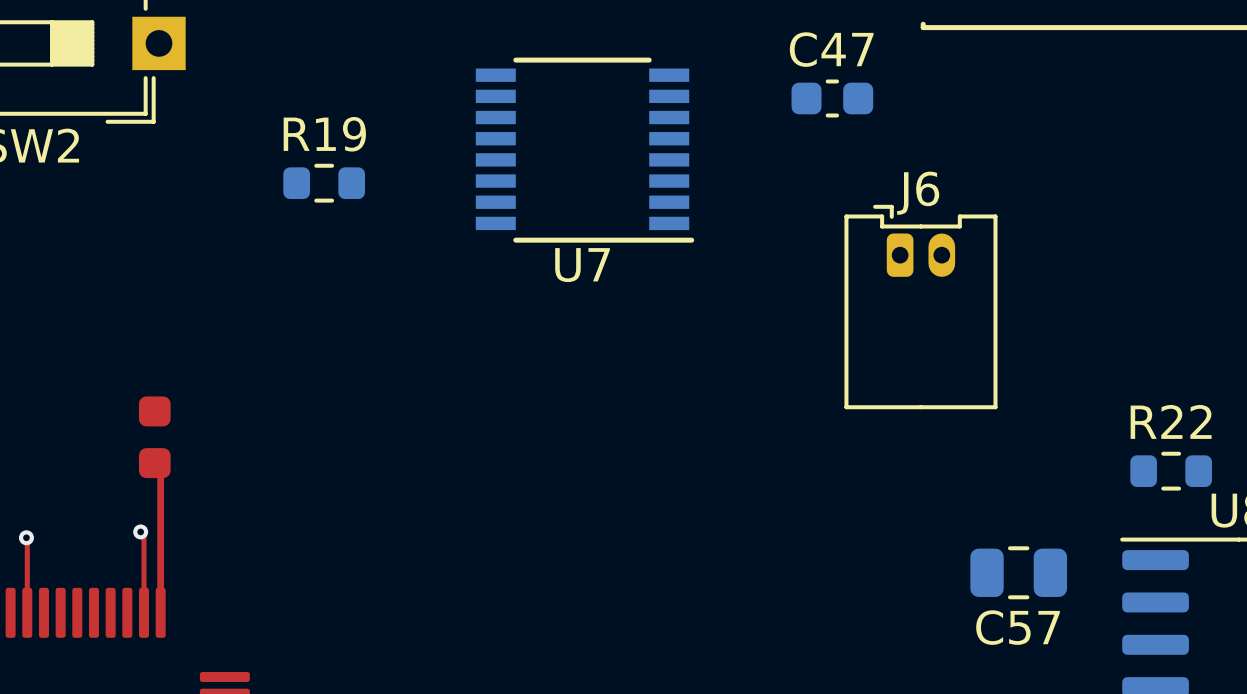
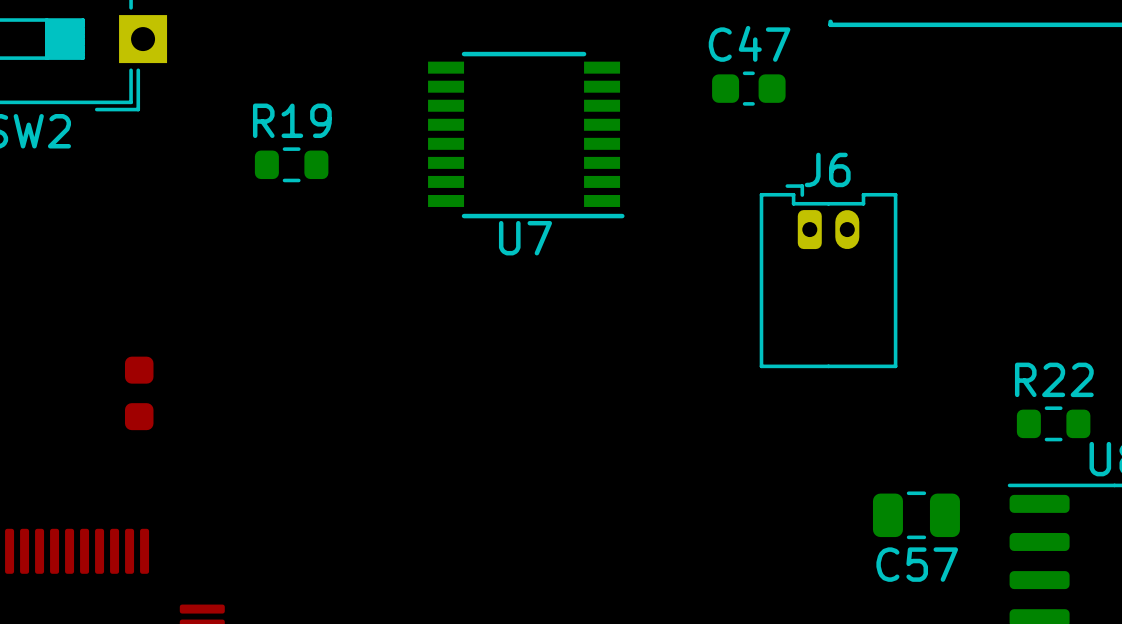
top track: (154, 463) (160, 469) (160, 612) -> none
top track: (140, 531) (144, 535) (144, 612) -> none
via: (140, 531) -> none
top track: (26, 537) (27, 612) -> none
via: (26, 537) -> none

